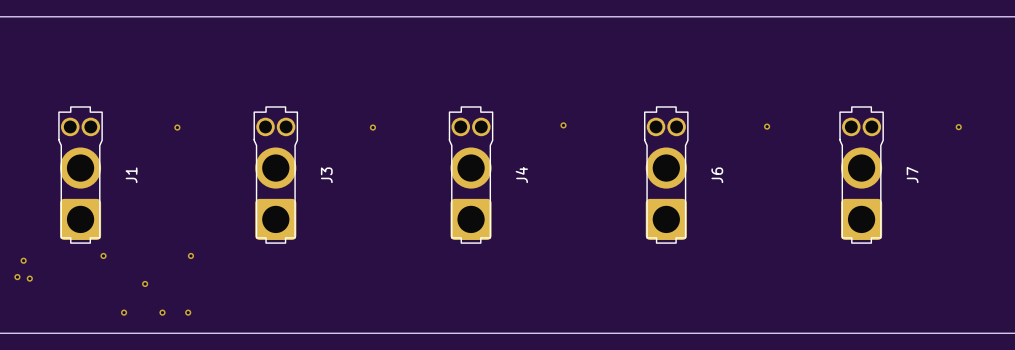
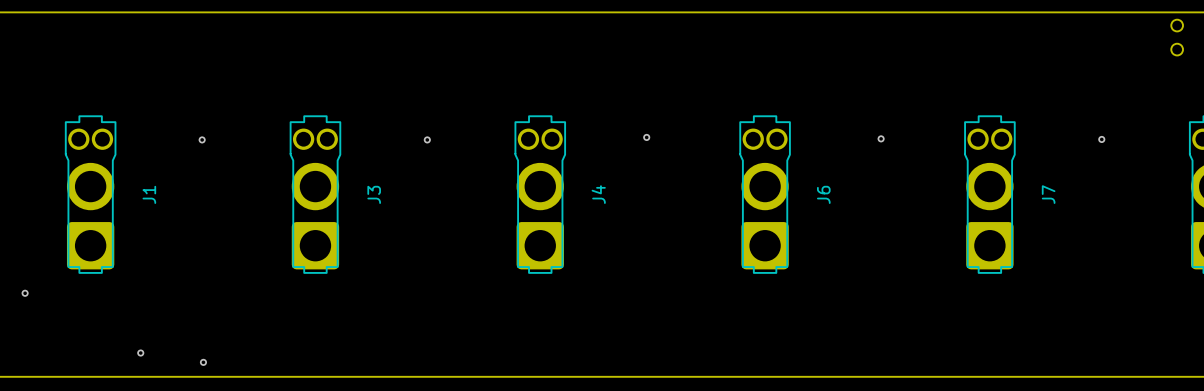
via: (103, 255) -> none
via: (190, 255) -> none
via: (17, 277) -> none
via: (29, 278) -> none
via: (145, 283) -> none
via: (162, 312) -> none
via: (188, 312) -> none
via: none -> (203, 362)

